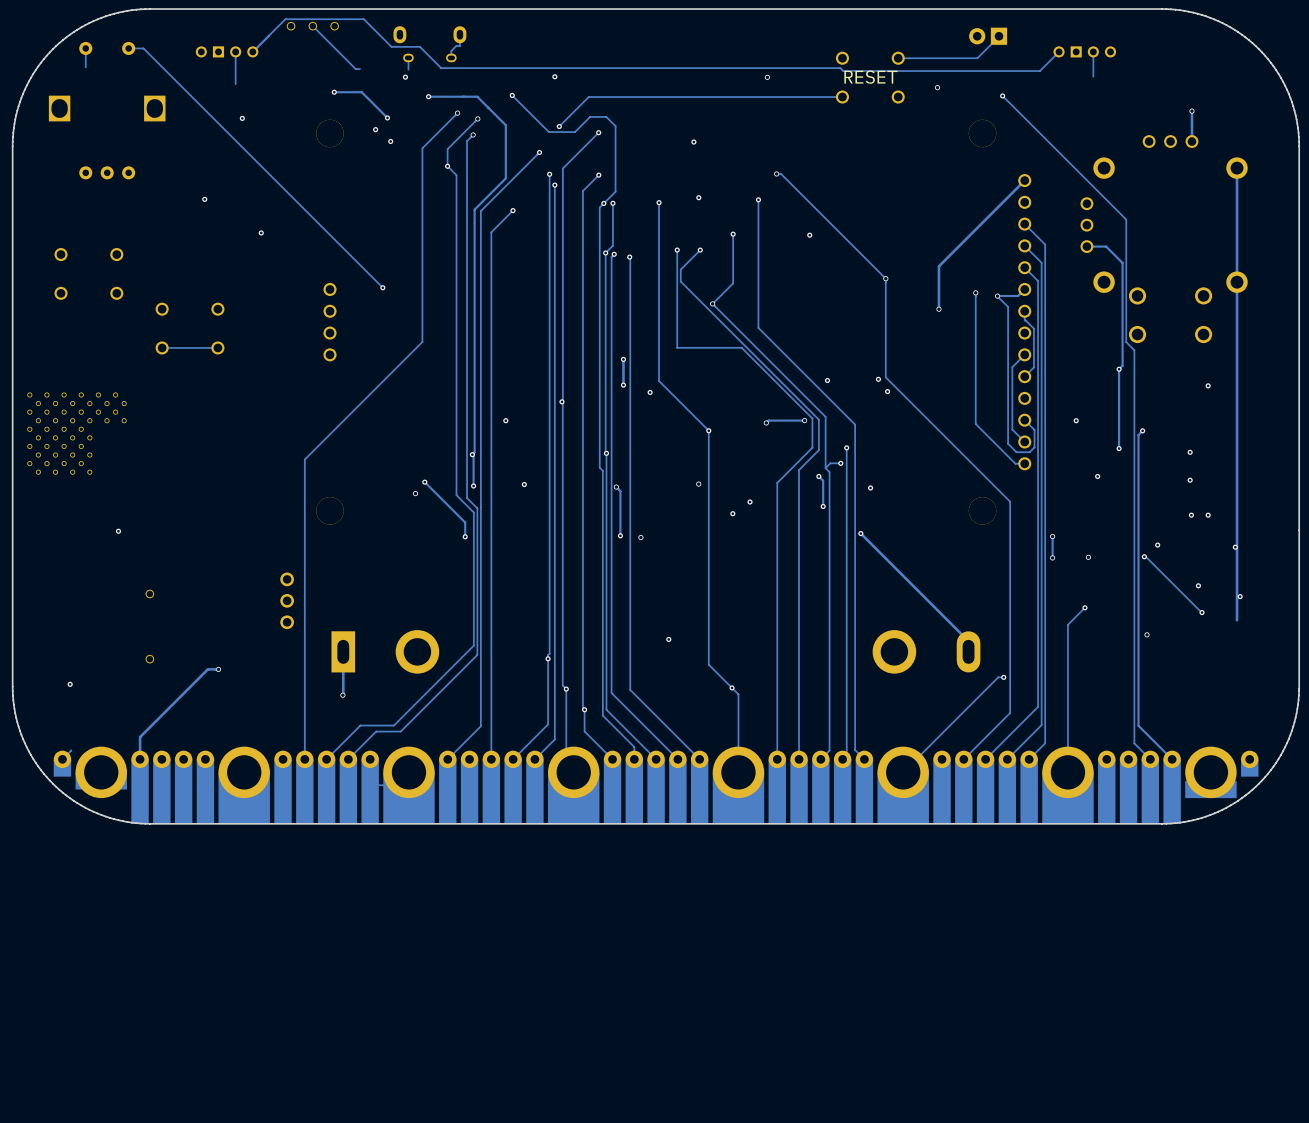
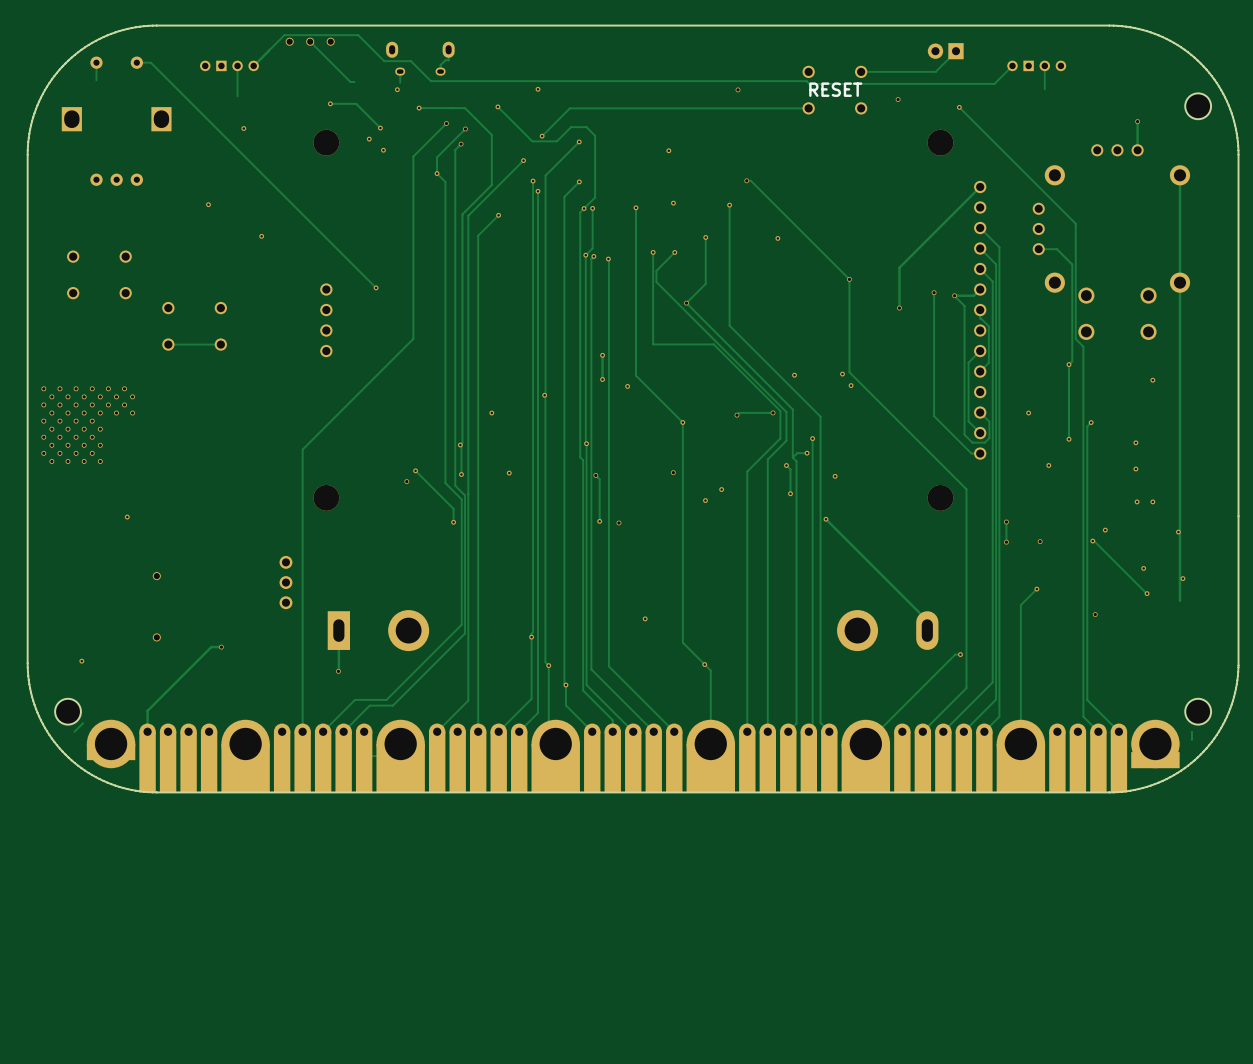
part: none -> (1198, 106)
part: none -> (68, 711)
part: none -> (1198, 711)
part footprint: [53, 746, 1259, 824] -> [86, 719, 1180, 793]

